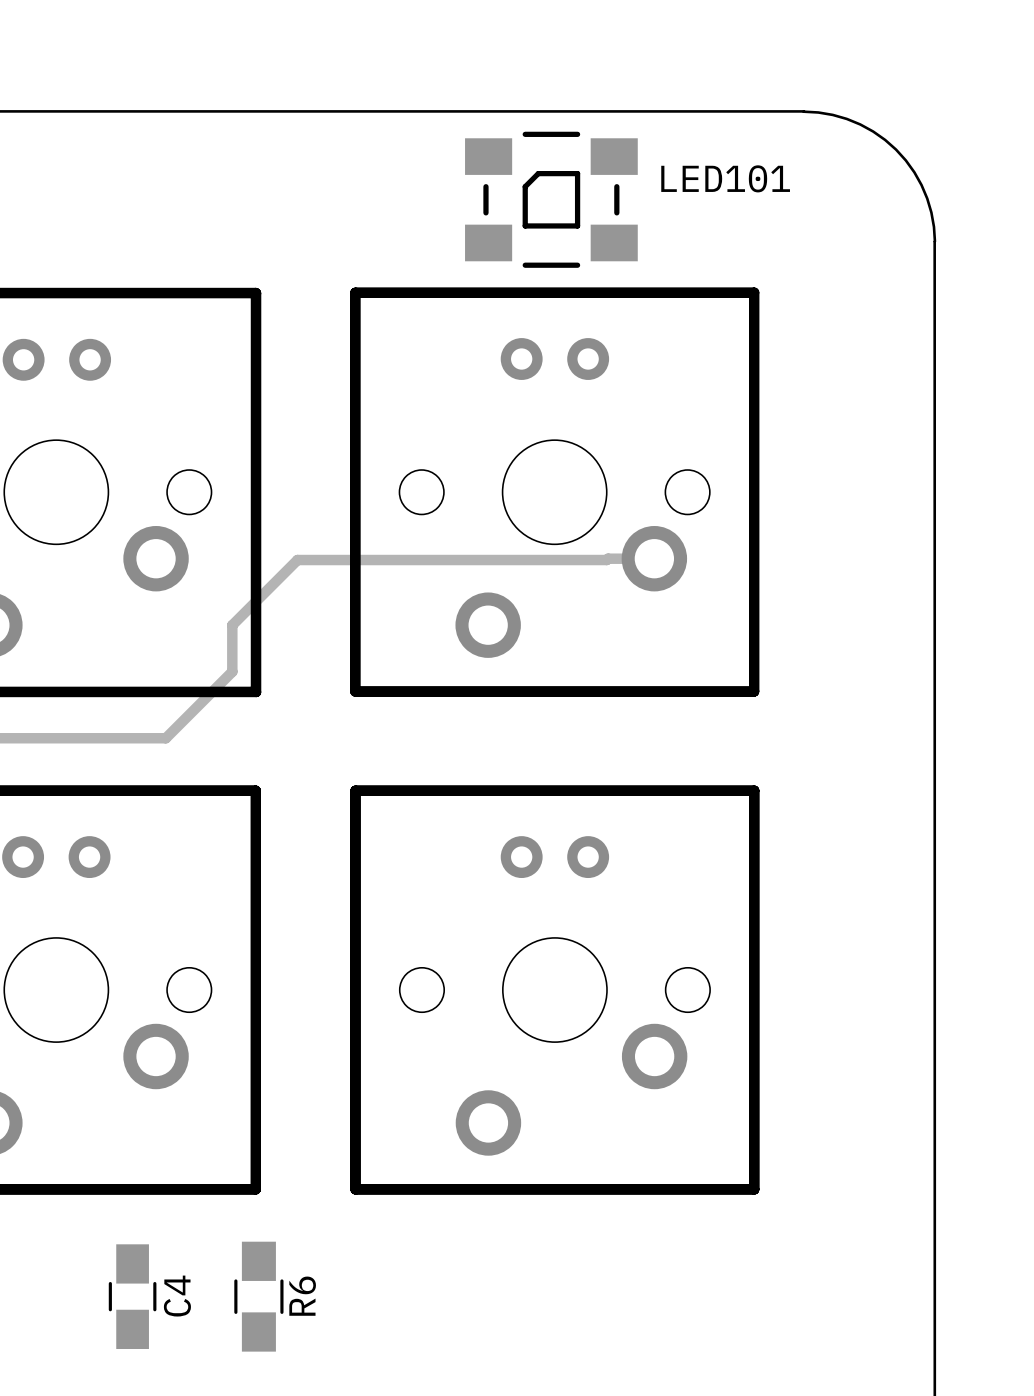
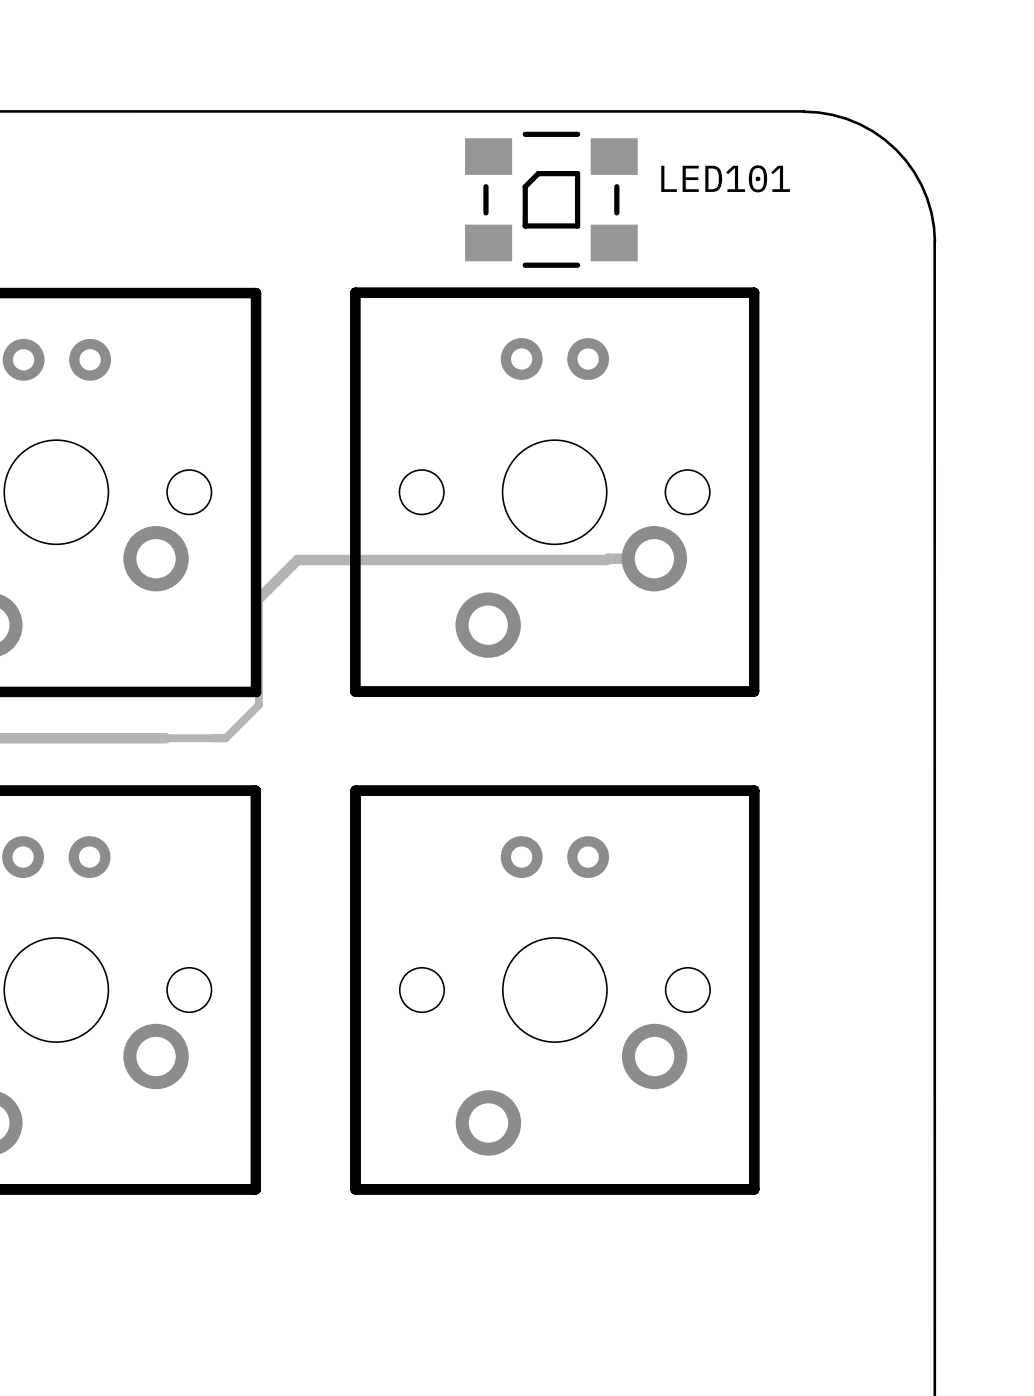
track: (258, 598) (232, 625) (232, 671) (165, 738) -> (258, 598) (258, 705) (225, 738) (165, 738)
C4: (132, 1296) -> none
R6: (258, 1296) -> none

